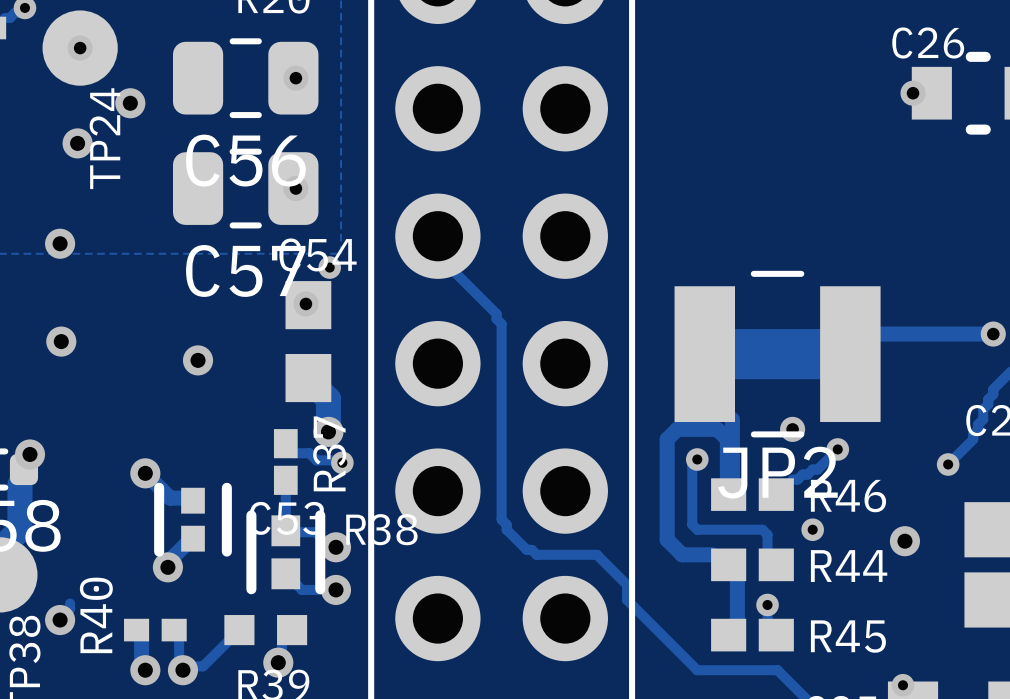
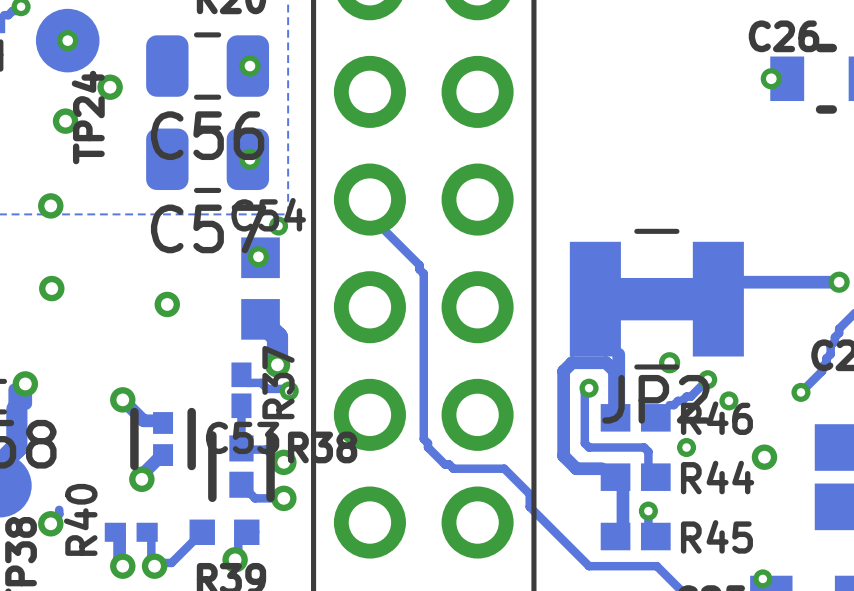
via: none -> (728, 400)

